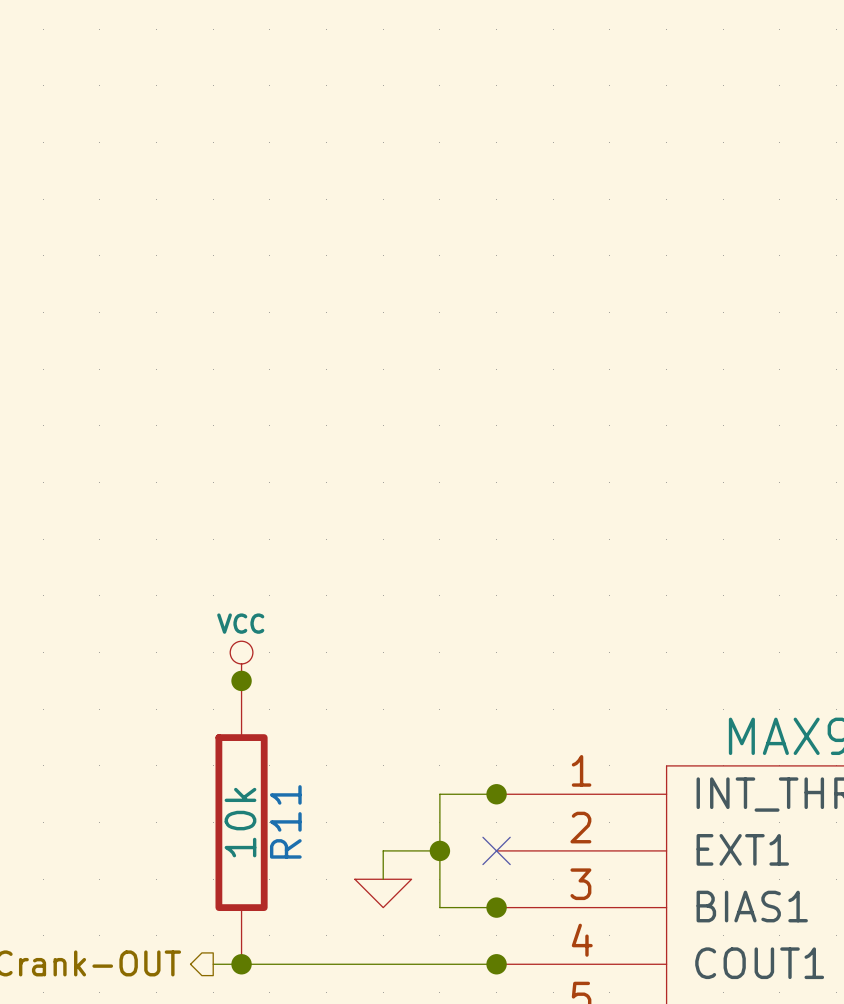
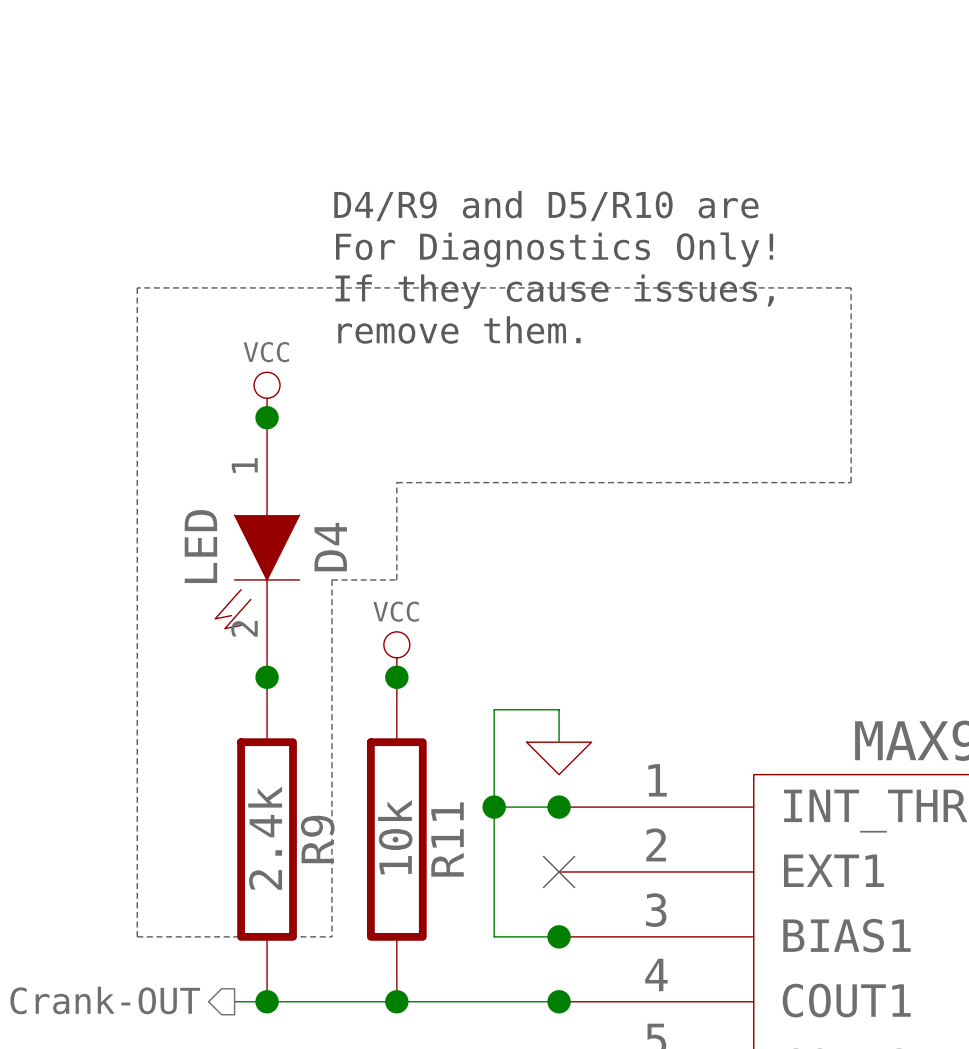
text: none -> D4/R9 and D5/R10 are (546, 206)
text: none -> For Diagnostics Only! (554, 249)
line: none -> (137, 287) (851, 287) (851, 482) (396, 482) (396, 579) (331, 579) (331, 936) (137, 936) (137, 287)
text: none -> If they cause issues, (554, 291)
text: none -> remove them. (459, 329)
power symbol: none -> VCC (267, 395)
junction: none -> (267, 417)
D4: none -> LED (257, 547)
power symbol: VCC (241, 661) -> none
power symbol: none -> VCC (396, 654)
junction: none -> (396, 677)
wire: none -> (559, 742) (559, 709) (494, 709) (494, 807)
R11 name: R11 (285, 821) -> R9 (317, 839)
R11 value: 10k (240, 822) -> 2.4k (265, 838)
R11: none -> 10k (396, 839)
wire: (439, 850) (383, 850) (383, 879) -> none
junction position: (439, 850) -> (494, 807)
power symbol position: (383, 893) -> (559, 758)
junction: none -> (396, 1001)

